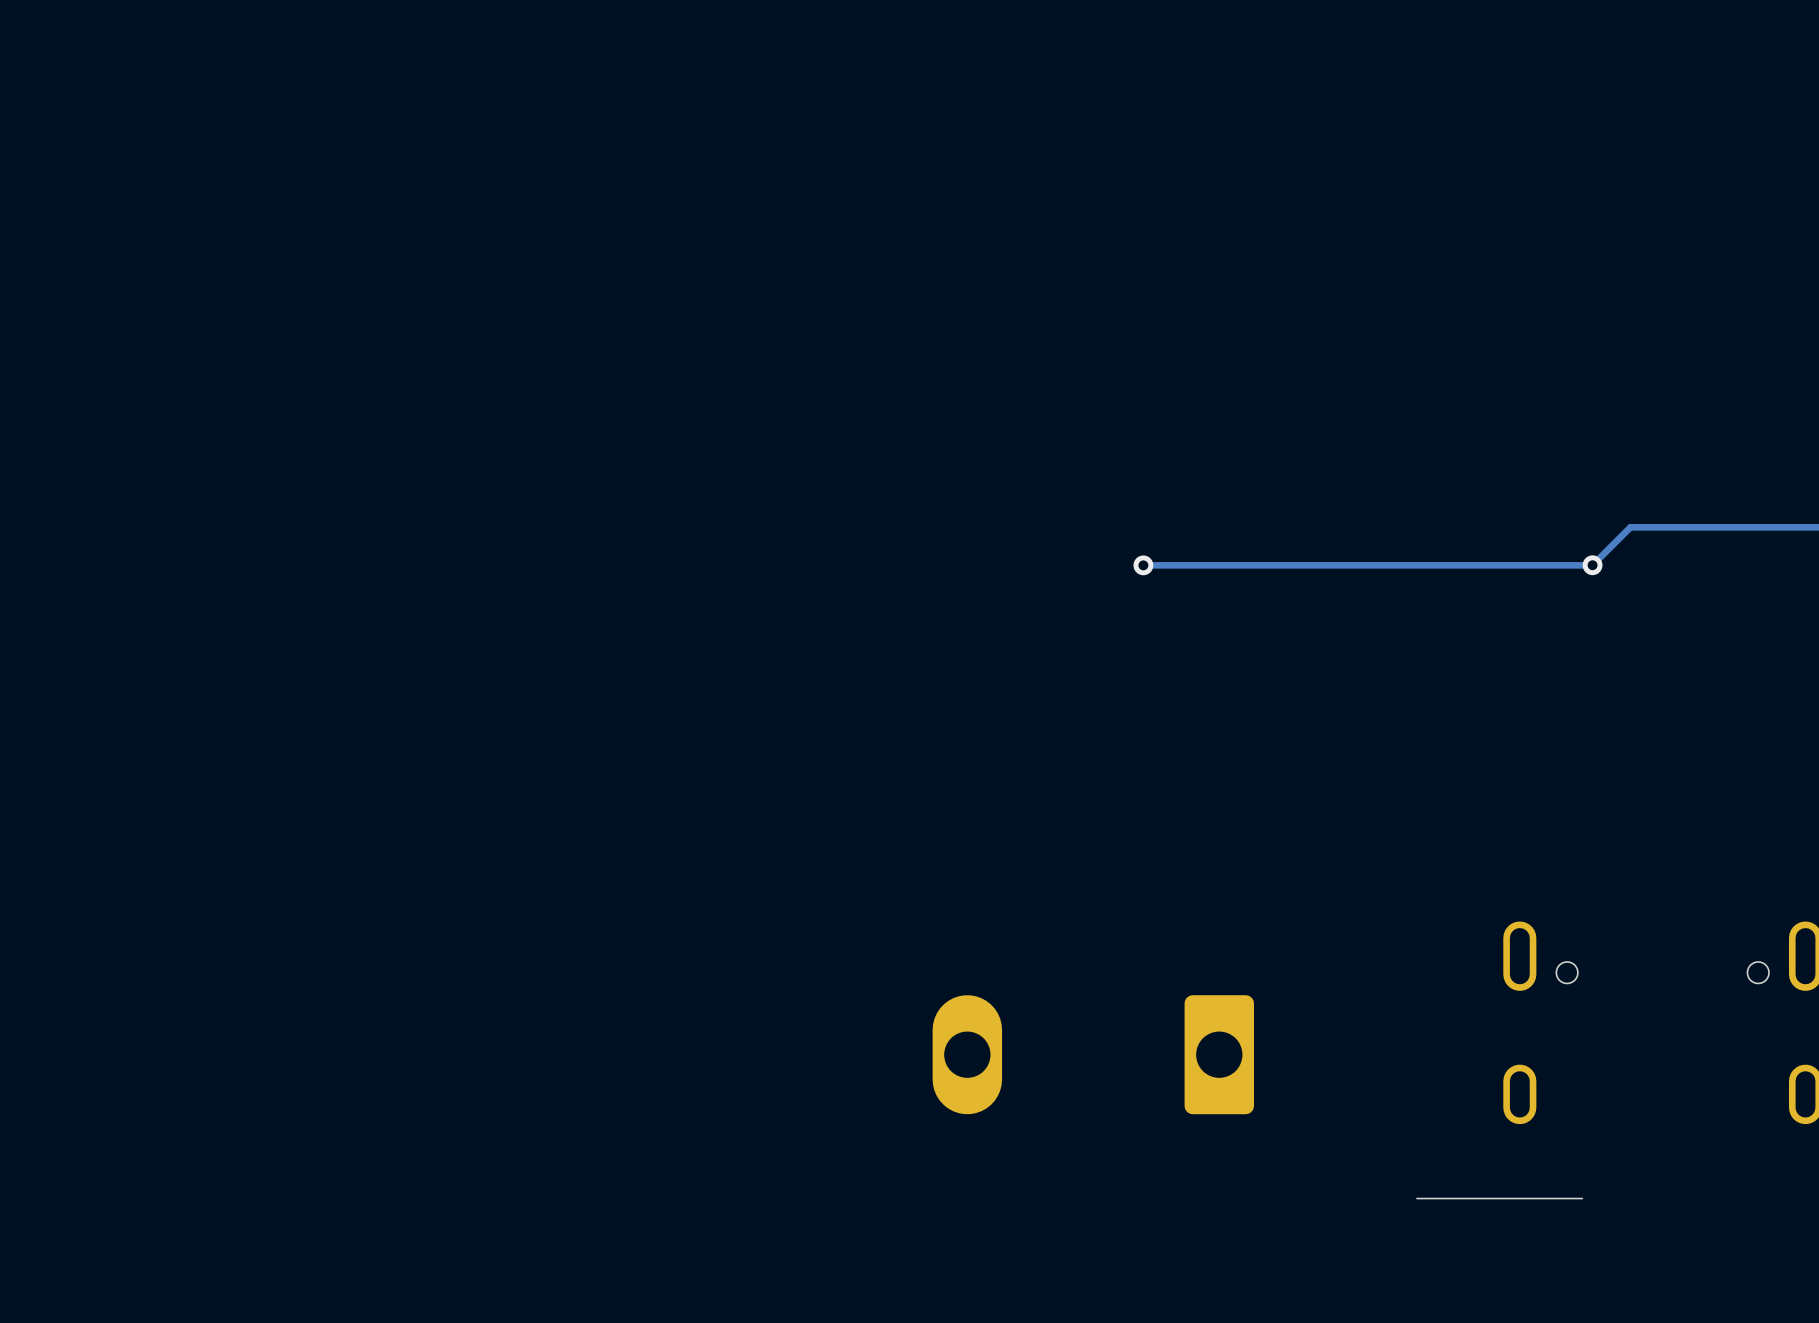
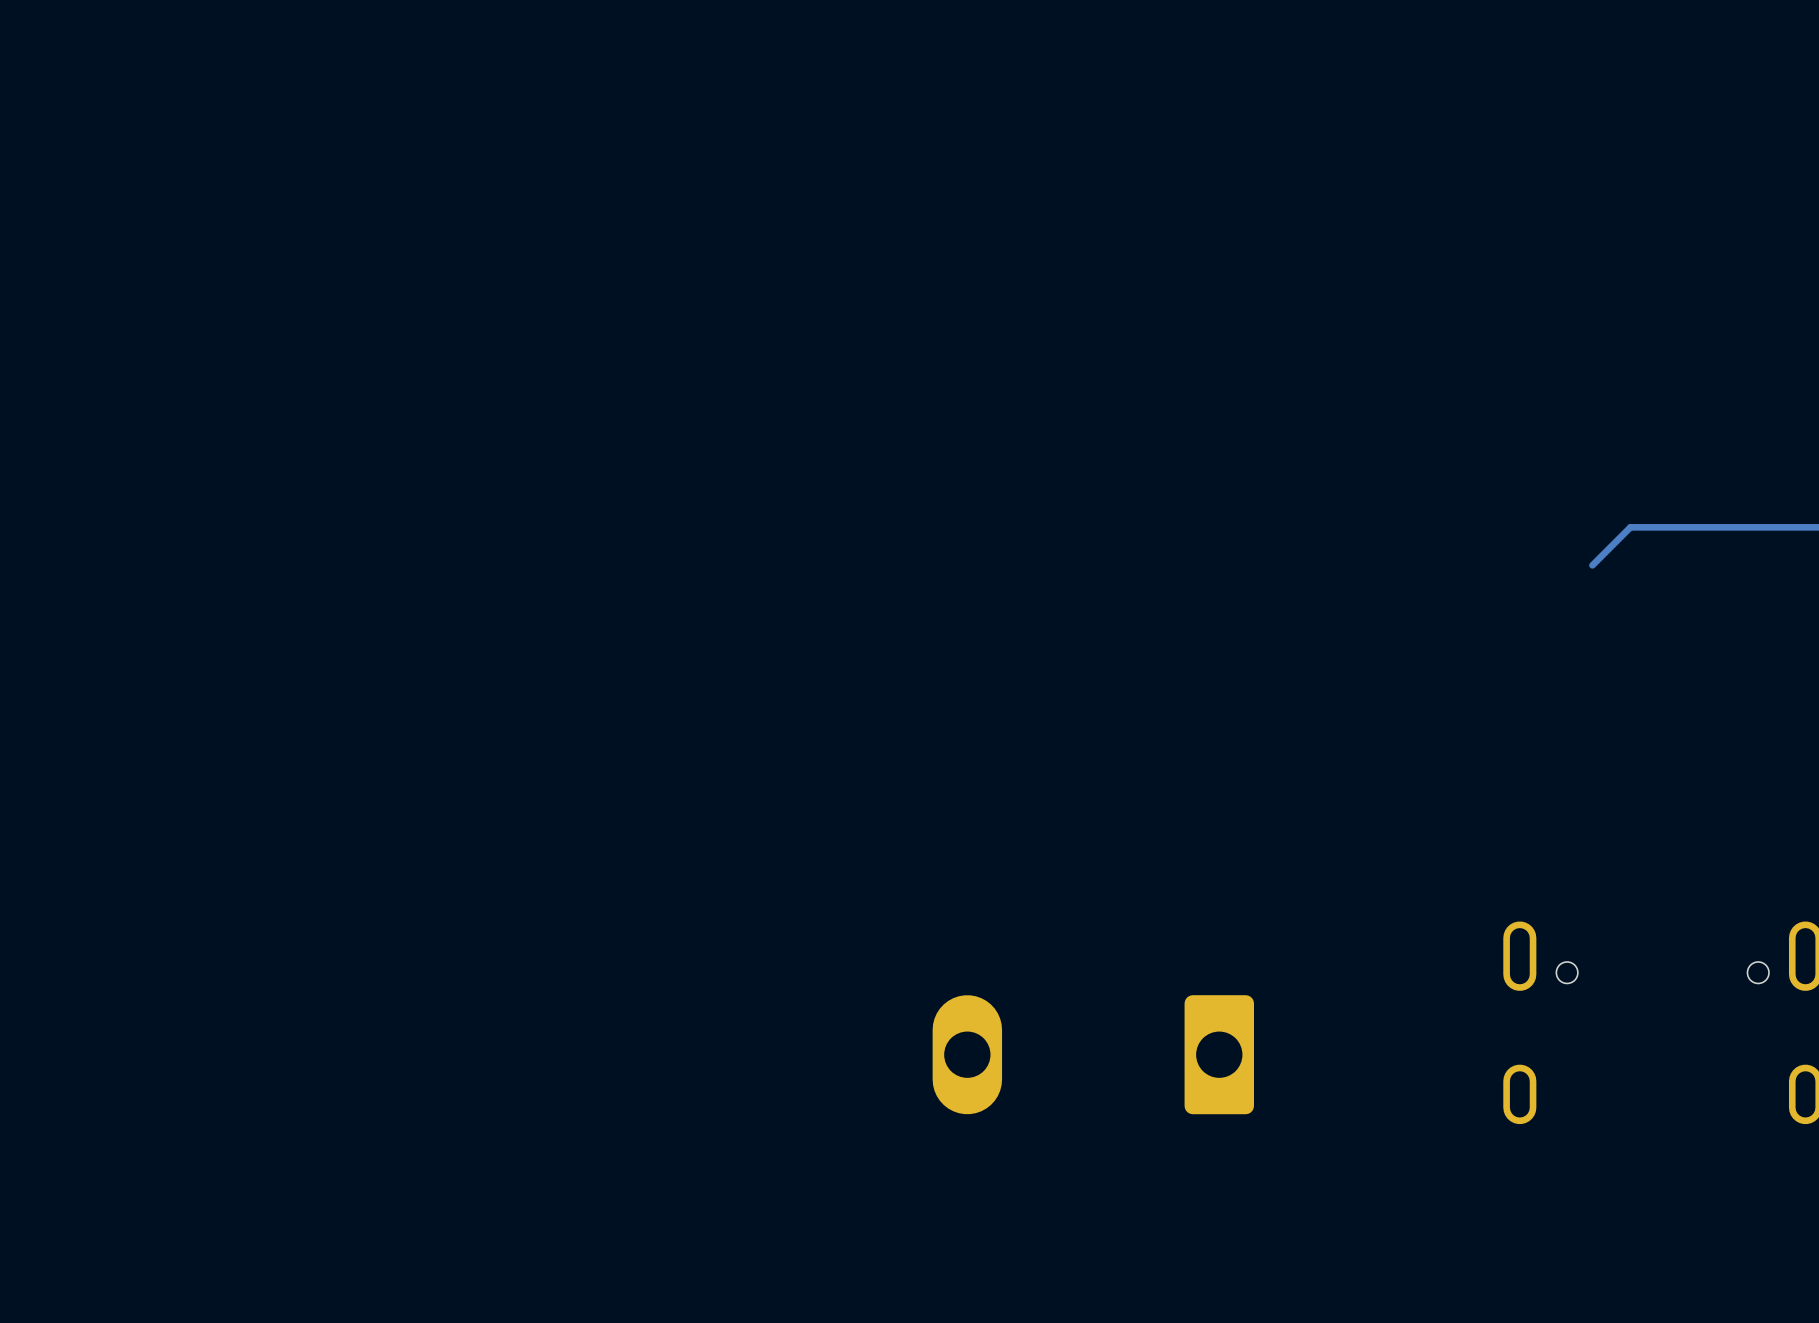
track: (1588, 560) (1592, 565) (1143, 565) -> none
via: (1143, 565) -> none
via: (1592, 565) -> none
board edge: (1582, 1198) (1417, 1198) -> none

